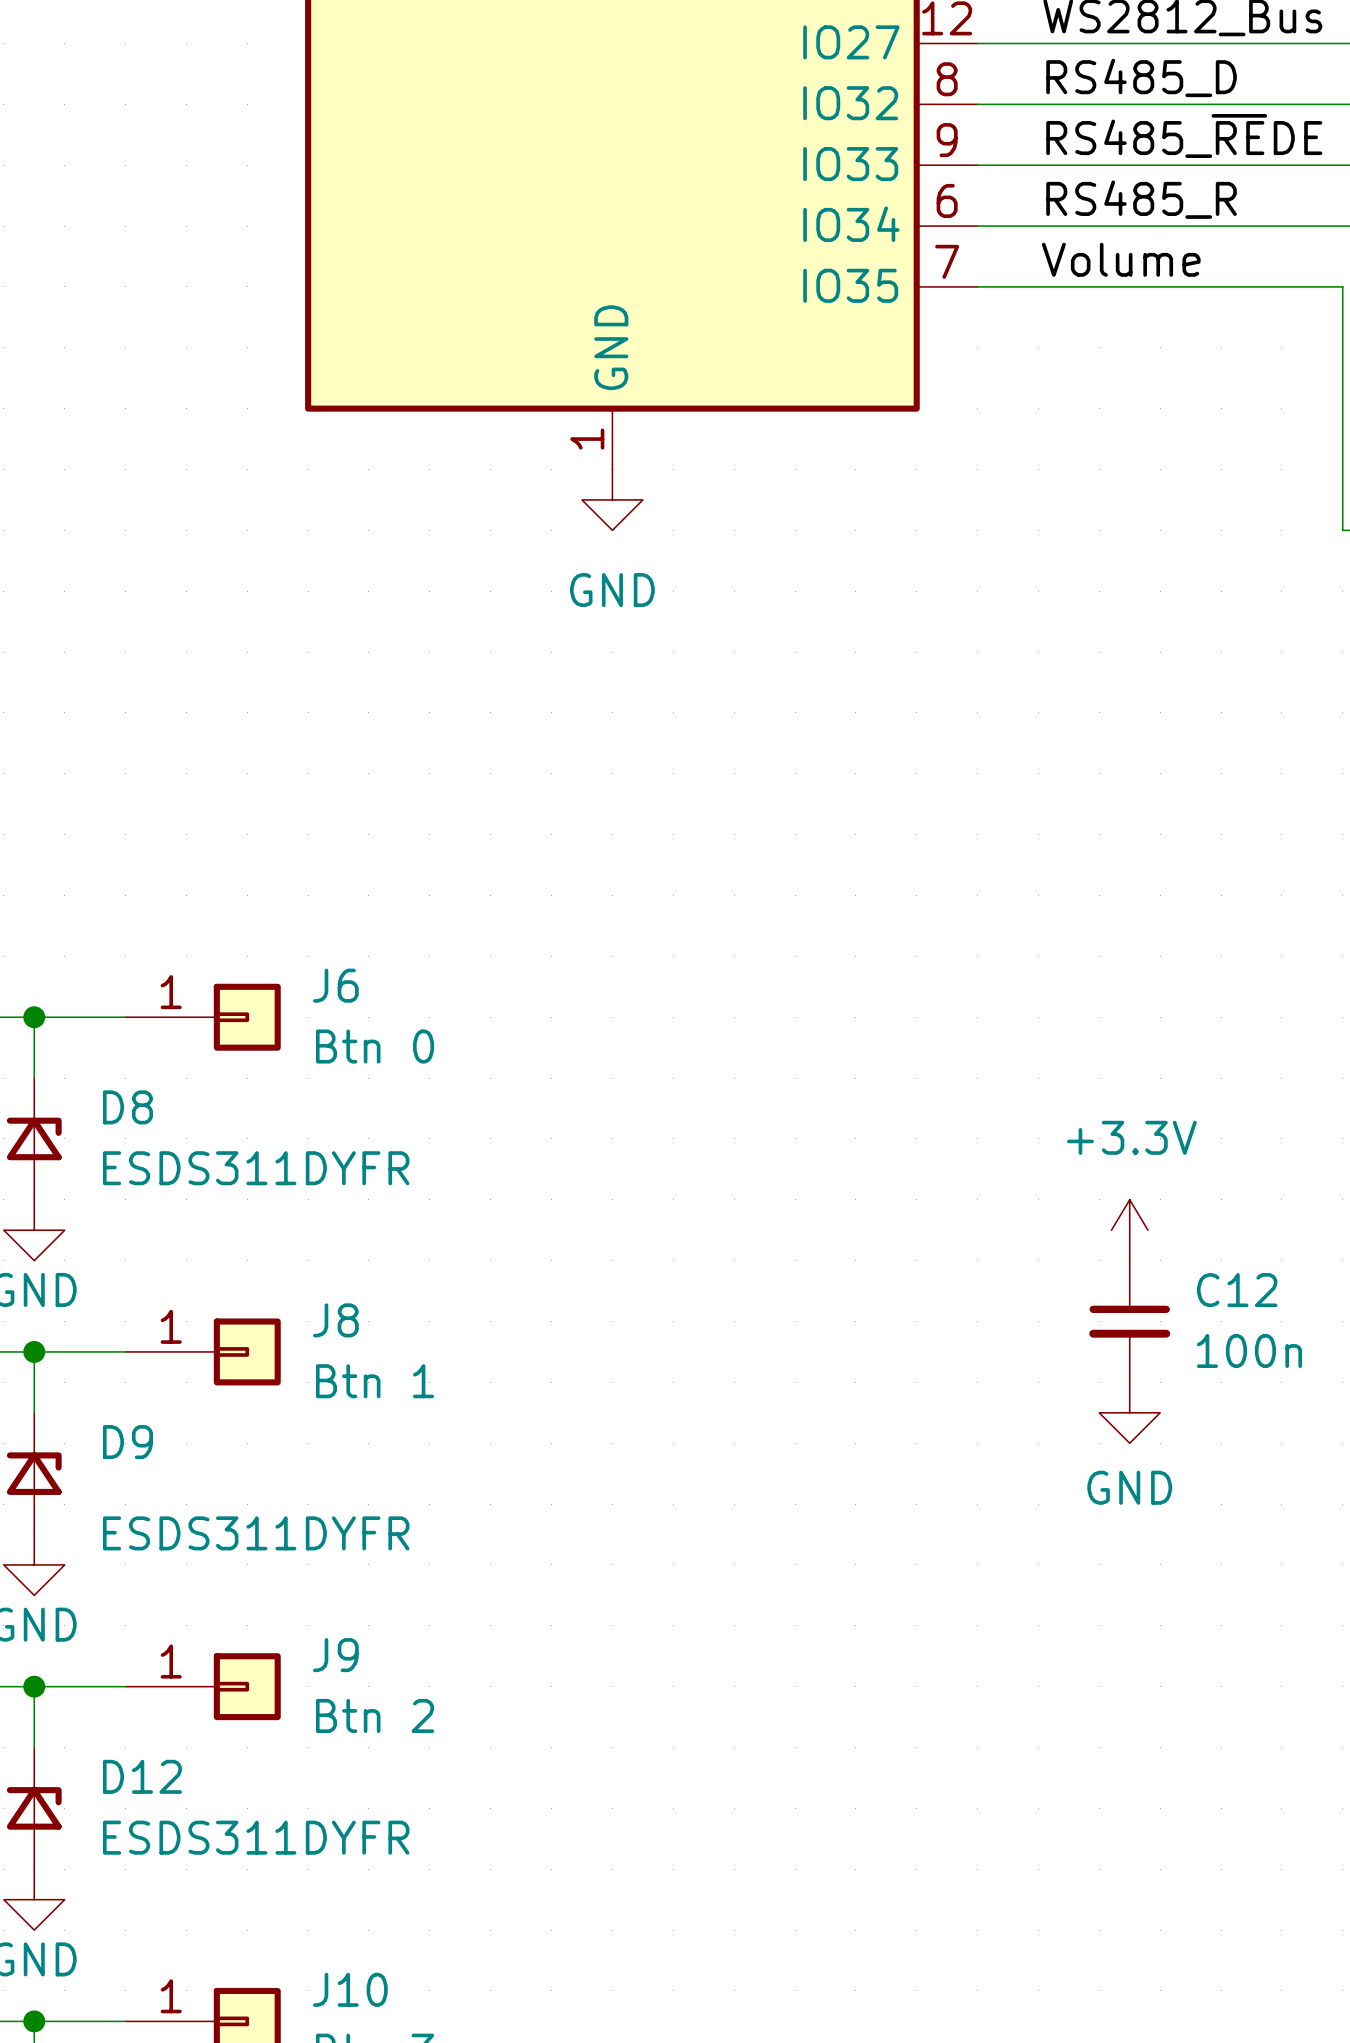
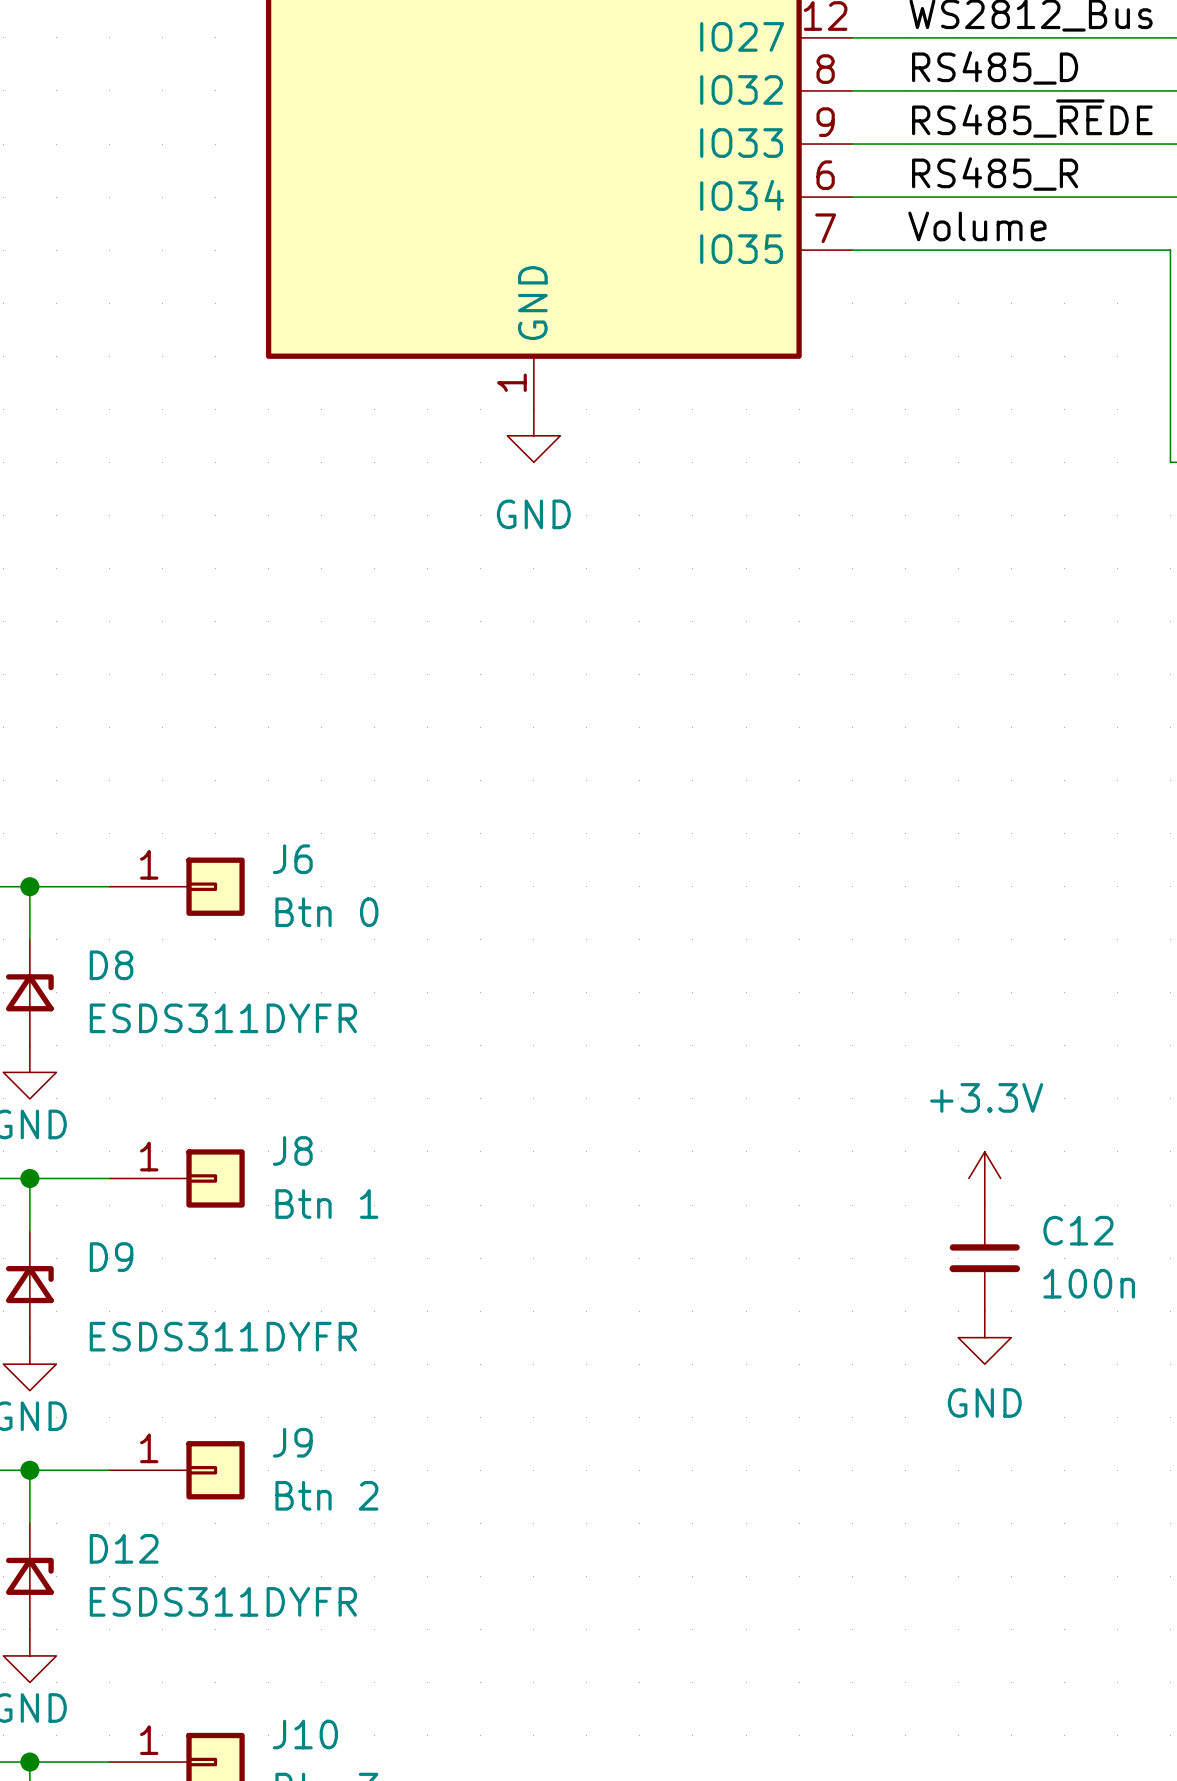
power symbol position: +3.3V (1129, 1230) -> +3.3V (984, 1178)
C12 position: (1129, 1321) -> (984, 1258)
power symbol position: GND (1129, 1412) -> GND (984, 1337)

